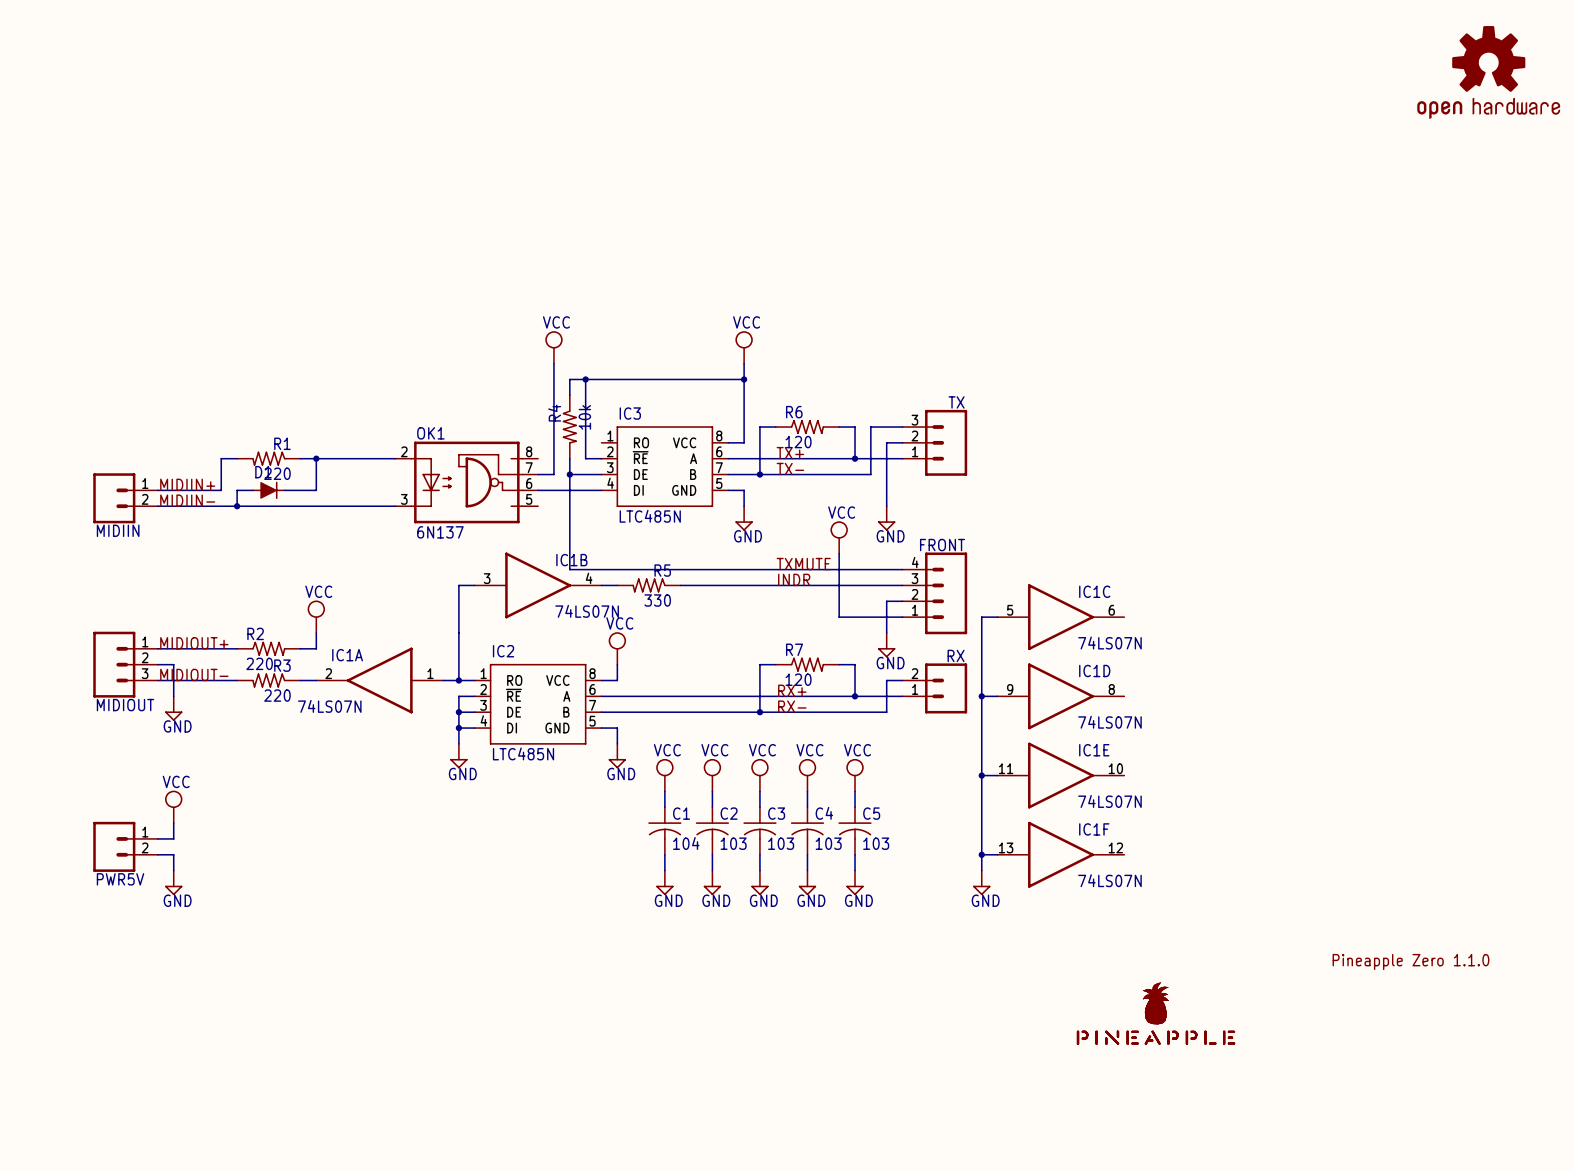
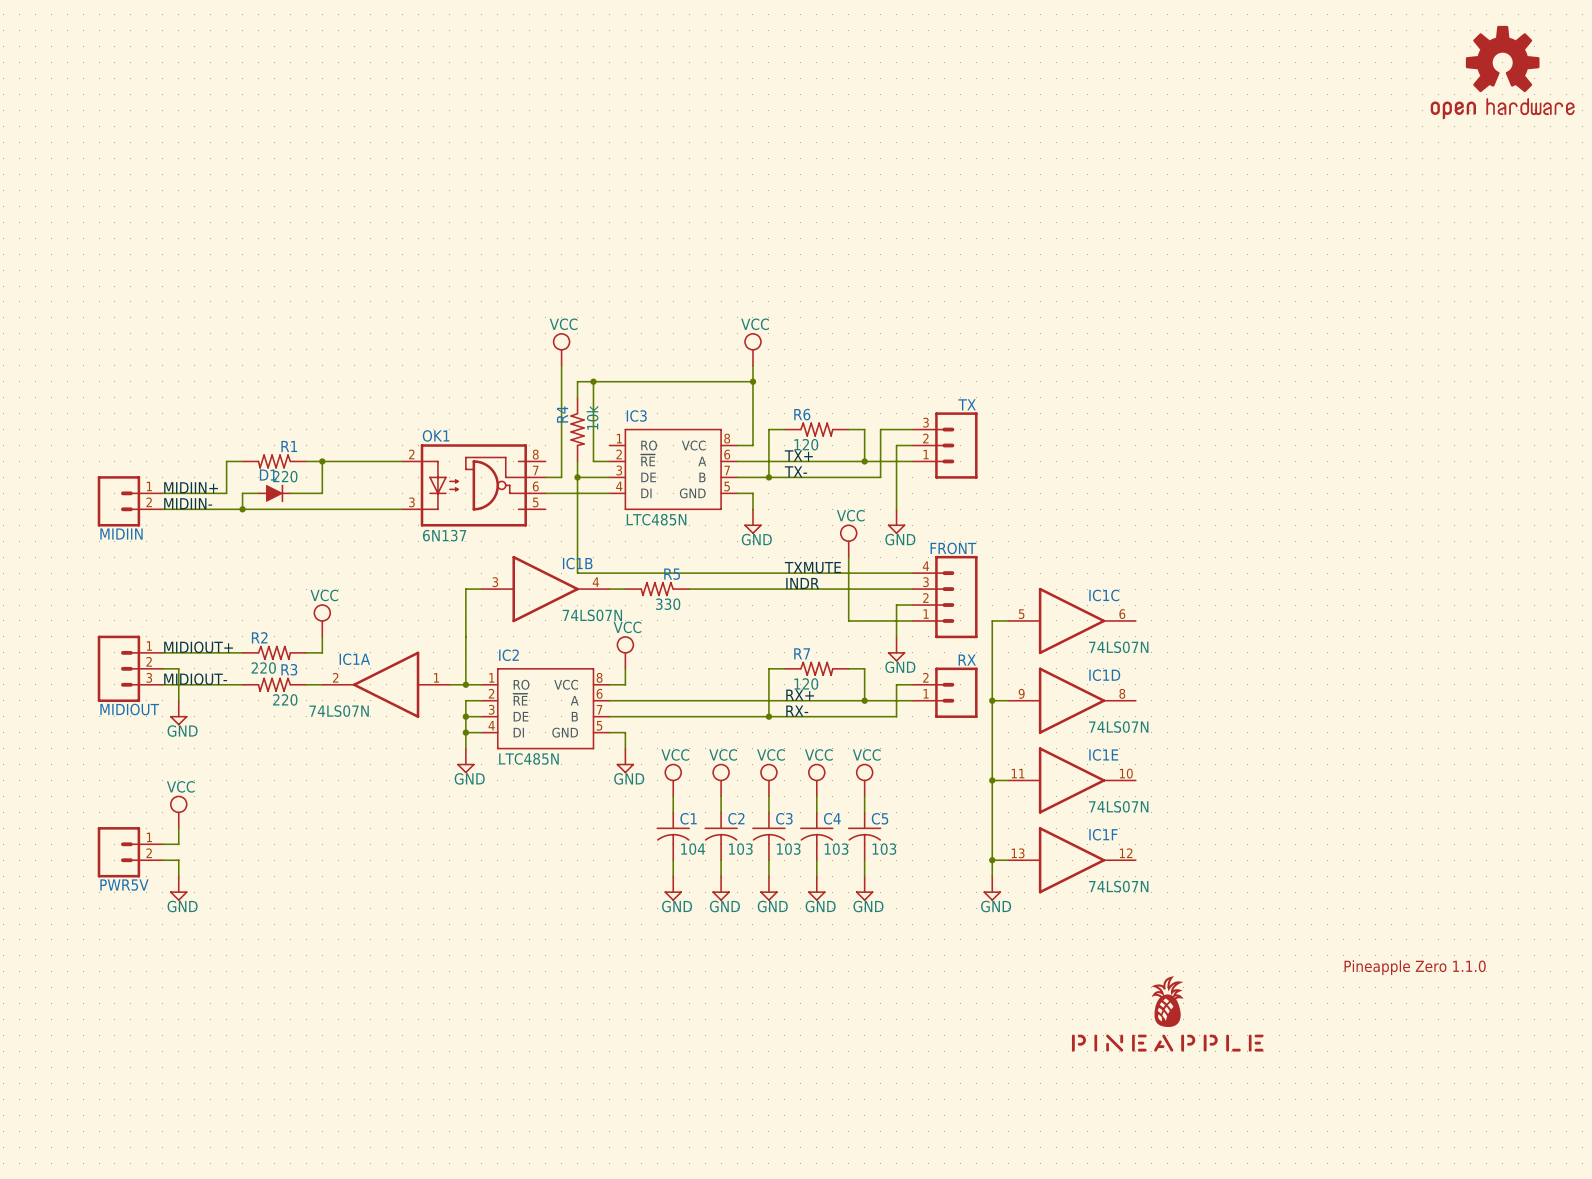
part: none -> (1167, 1013)
part: (1156, 1013) -> none

